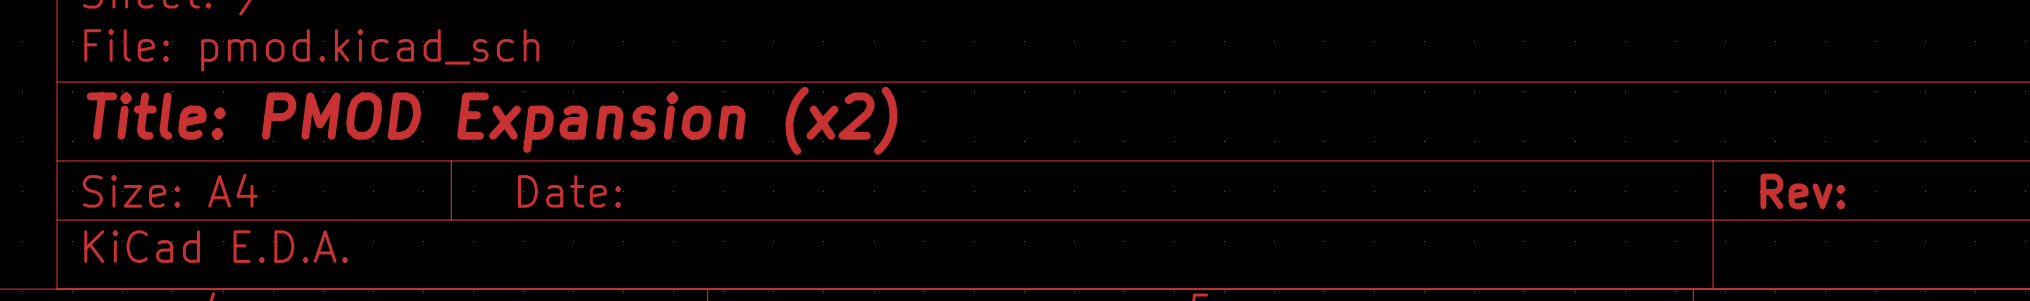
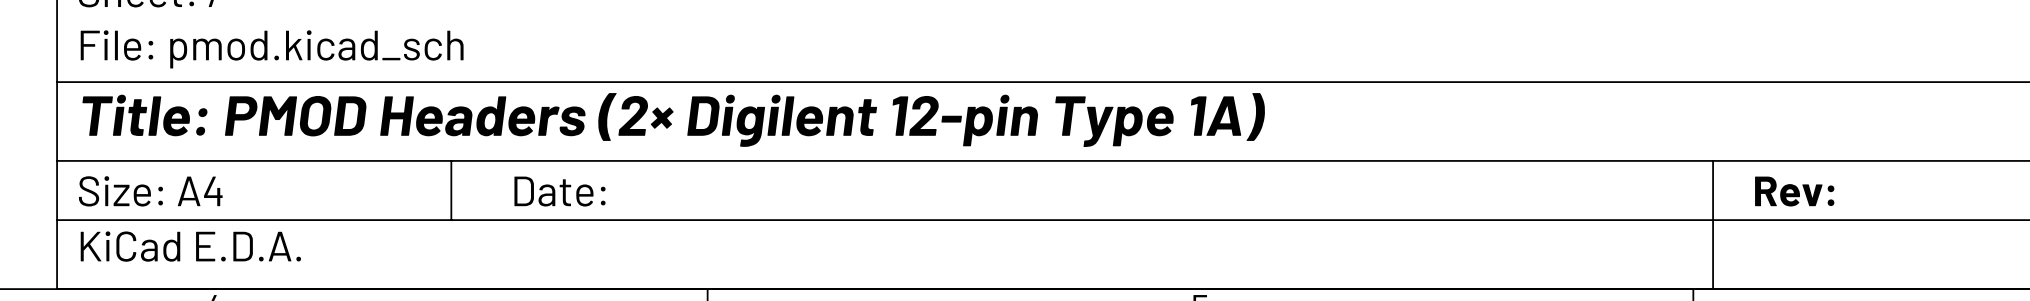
title block: Title: PMOD Expansion (x2) (492, 120) -> Title: PMOD Headers (2× Digilent 12-pin Type 1A) (674, 120)

